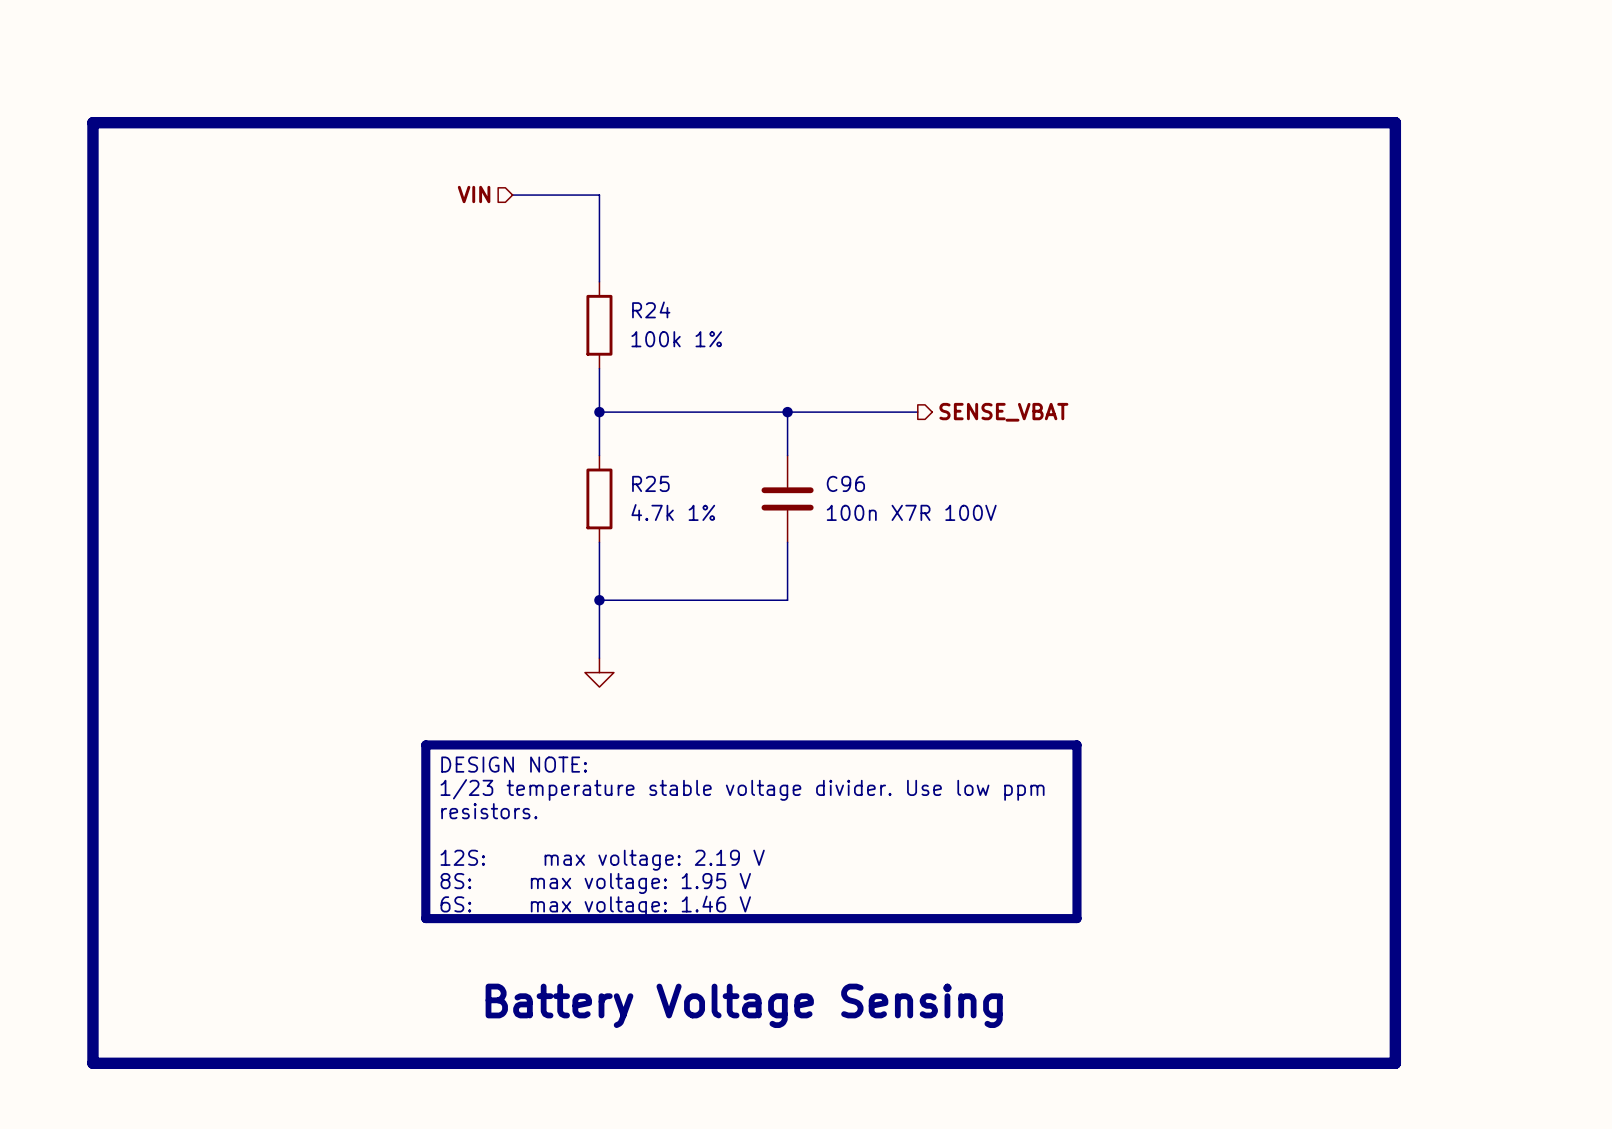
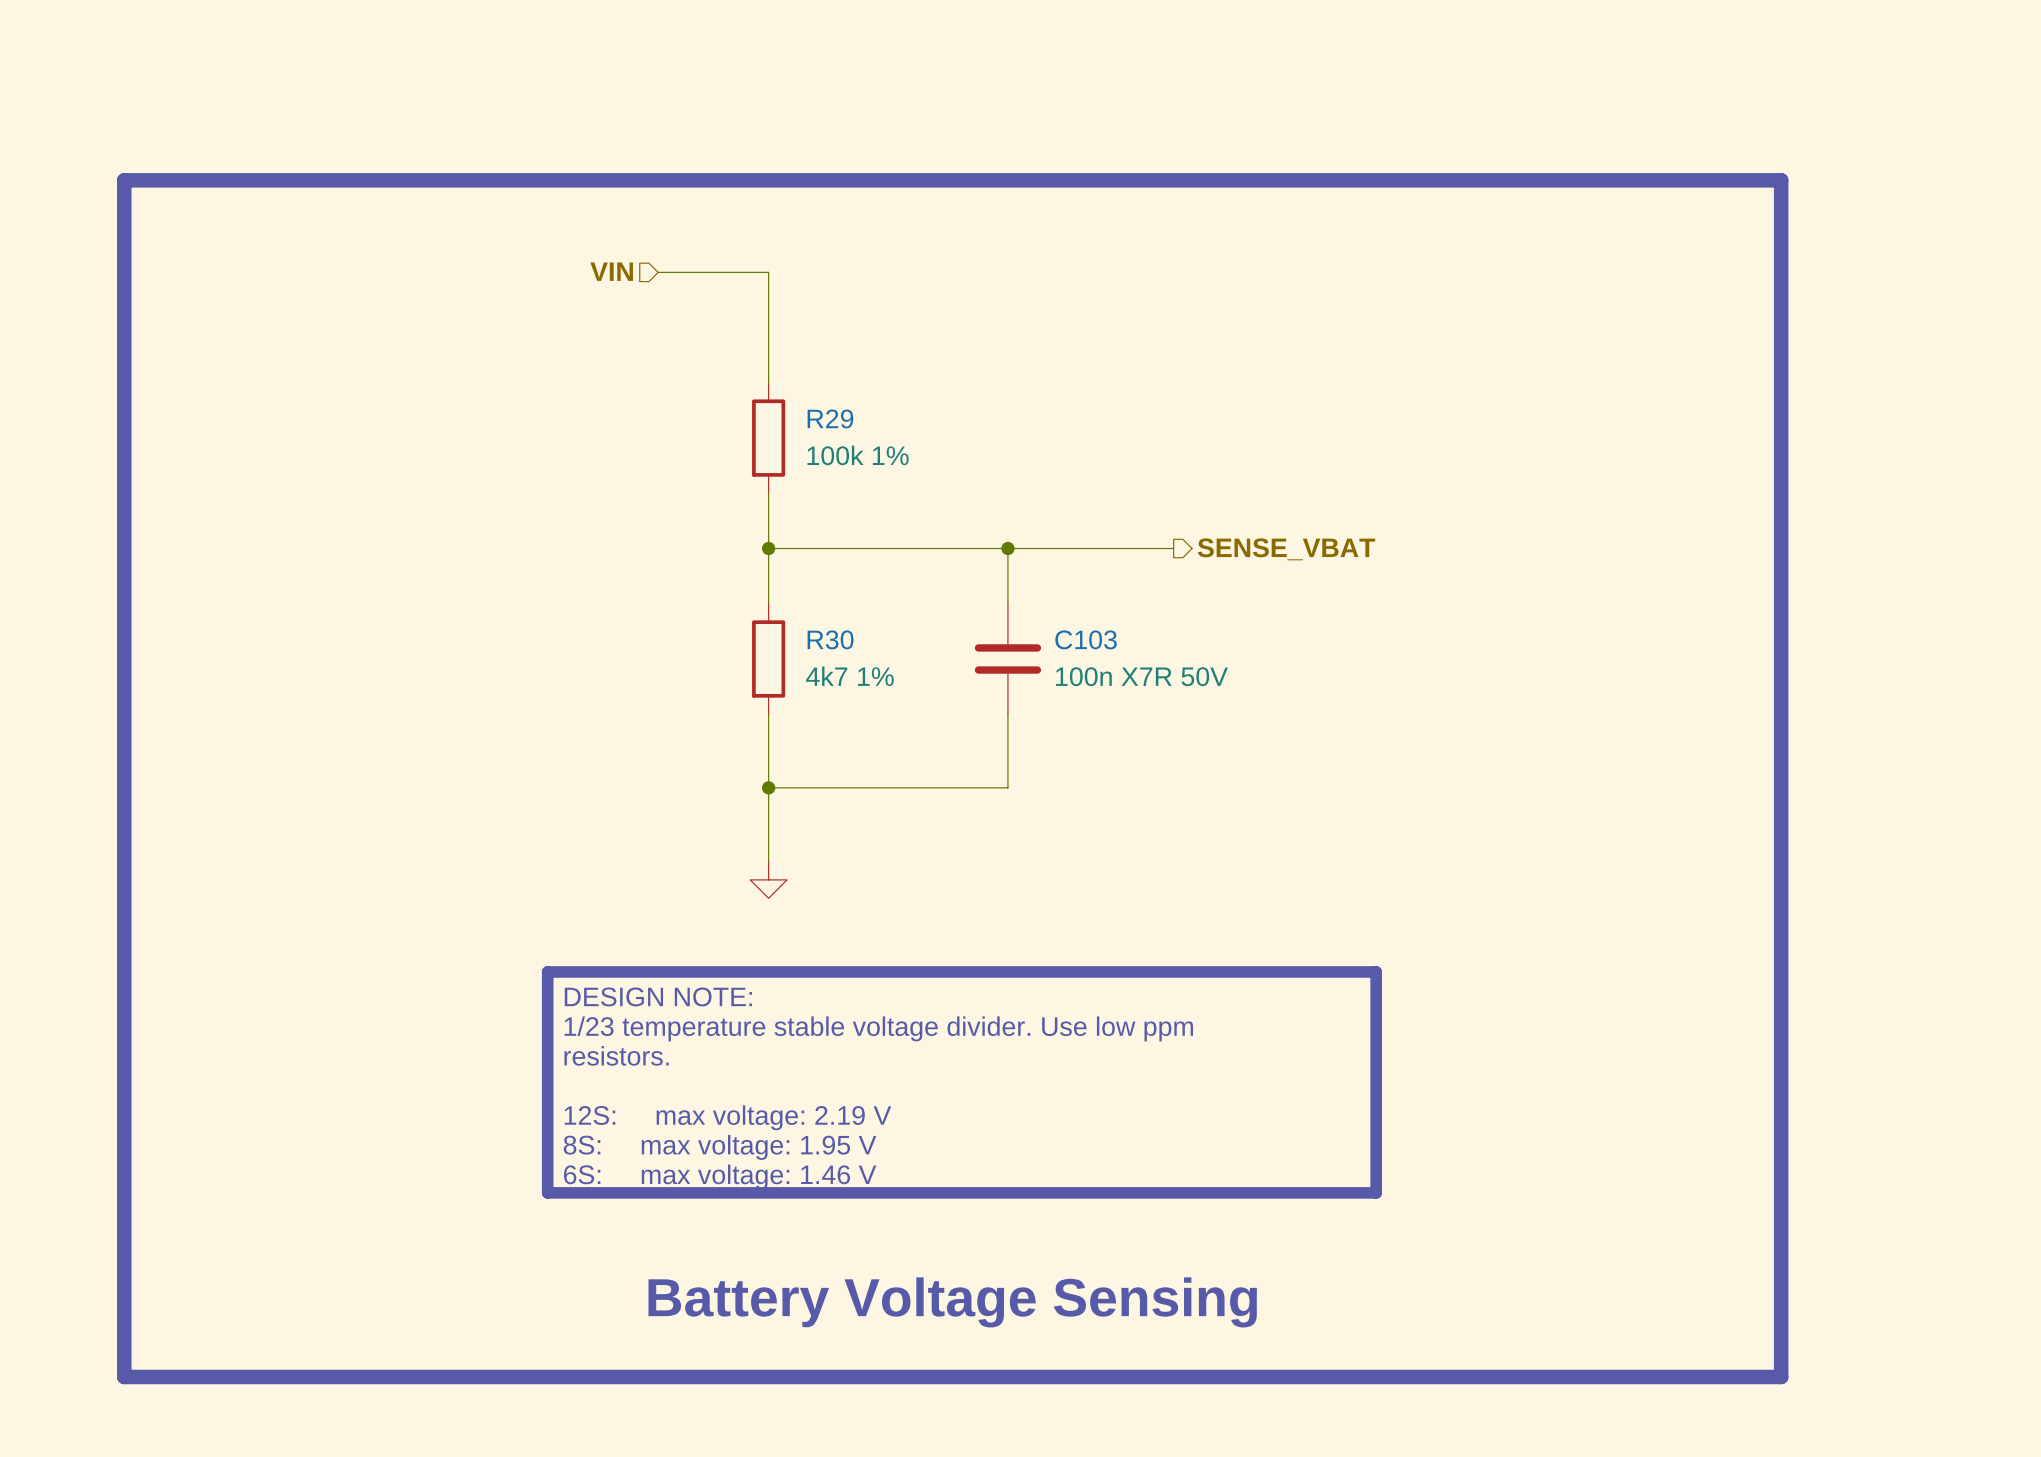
R24 name: R24 (651, 309) -> R29 (830, 418)
R25 name: R25 (650, 483) -> R30 (830, 639)
C96 name: C96 (845, 483) -> C103 (1086, 639)
R25 value: 4.7k 1% (673, 512) -> 4k7 1% (849, 676)
C96 value: 100n X7R 100V (911, 512) -> 100n X7R 50V (1141, 676)

